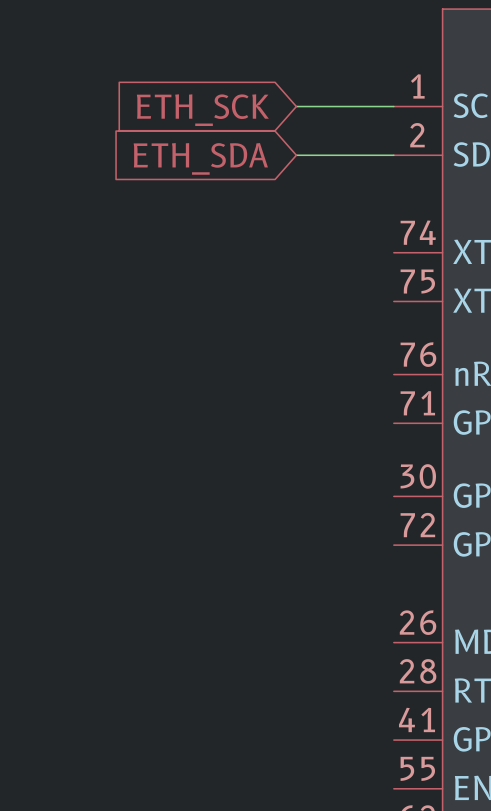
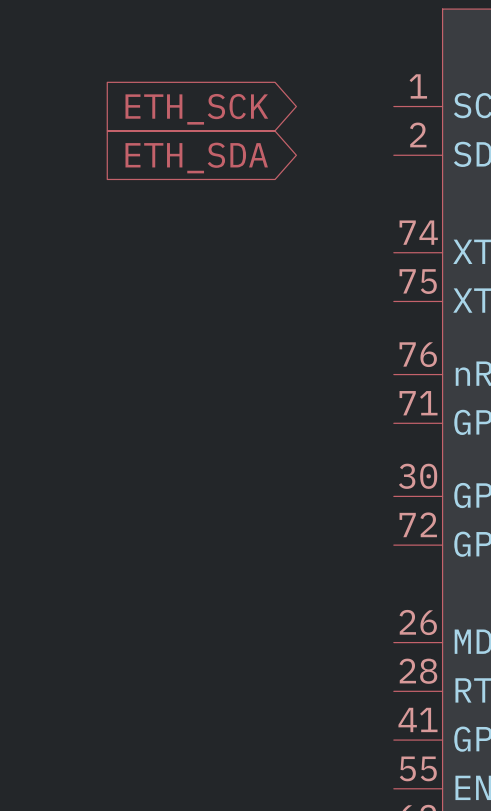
wire: (296, 106) (393, 106) -> none
wire: (296, 155) (393, 155) -> none

